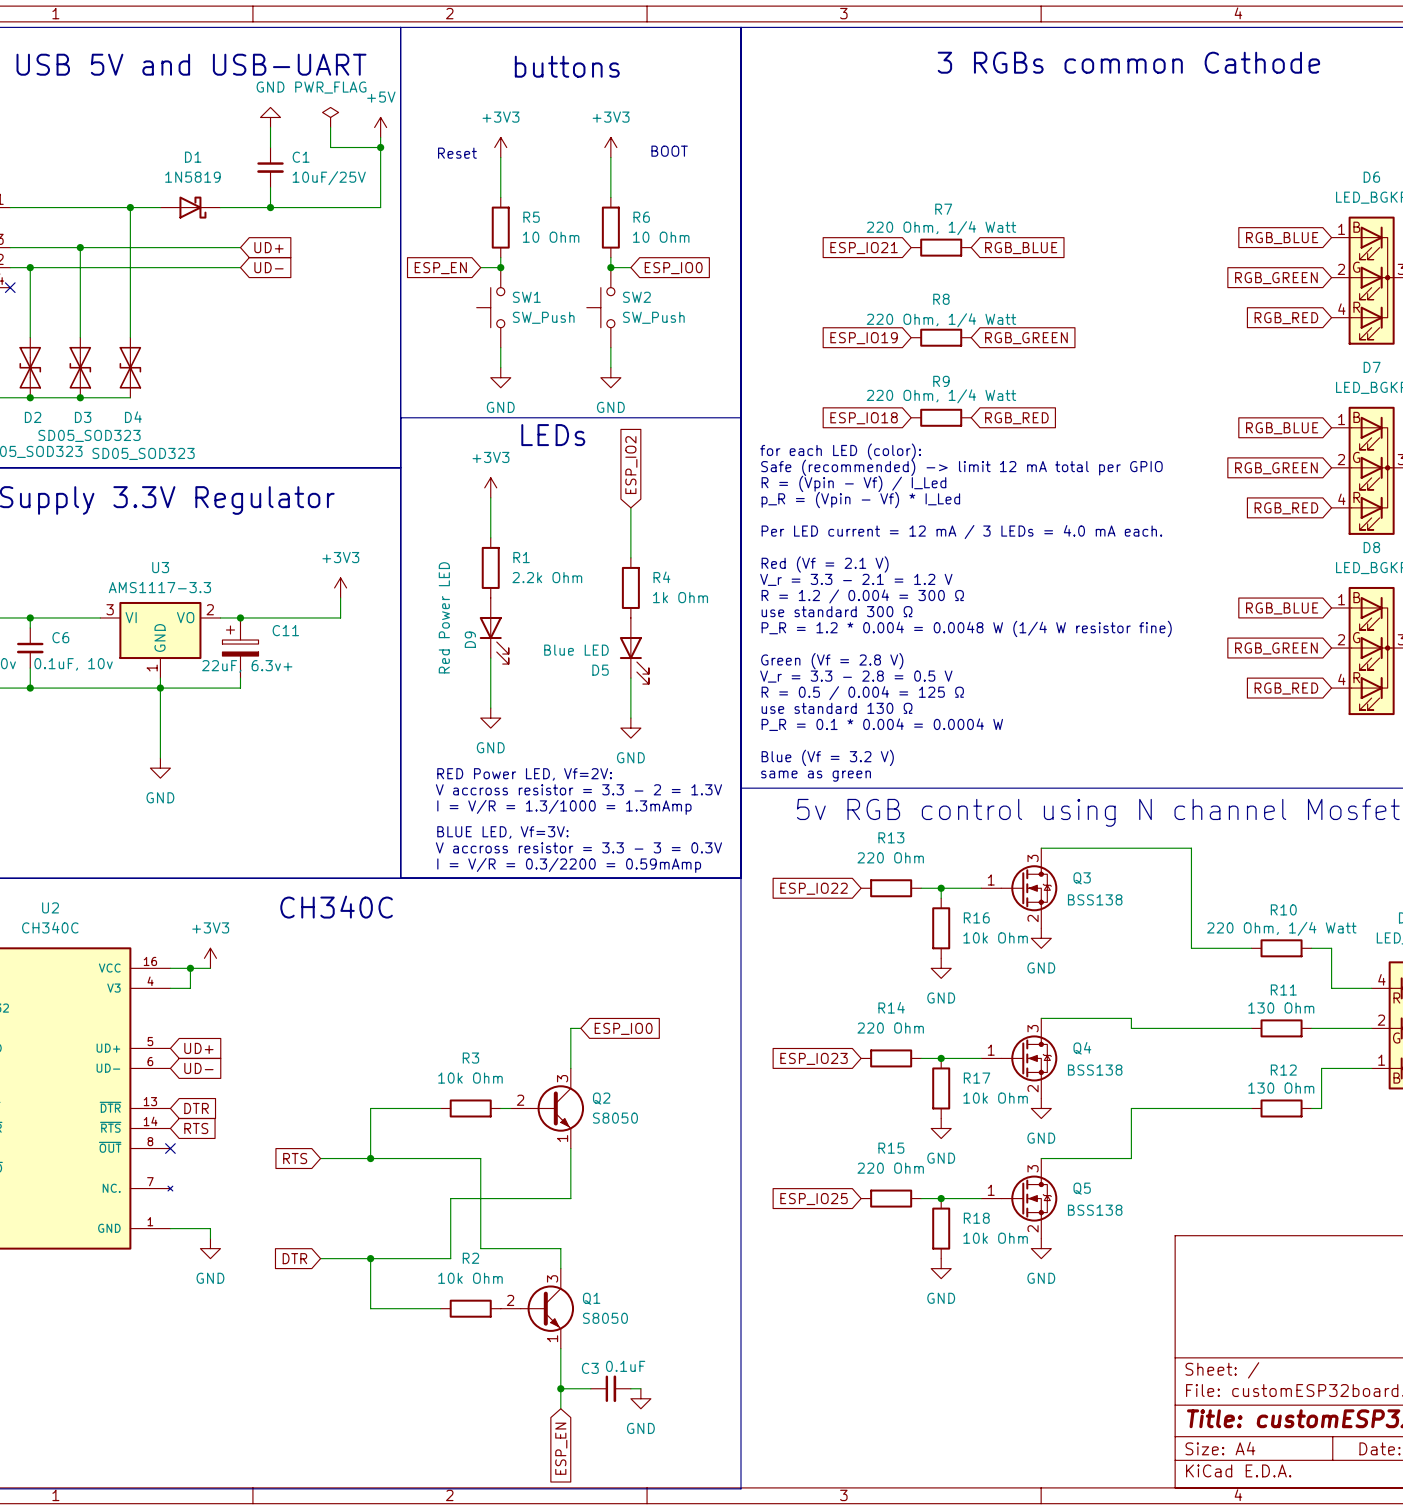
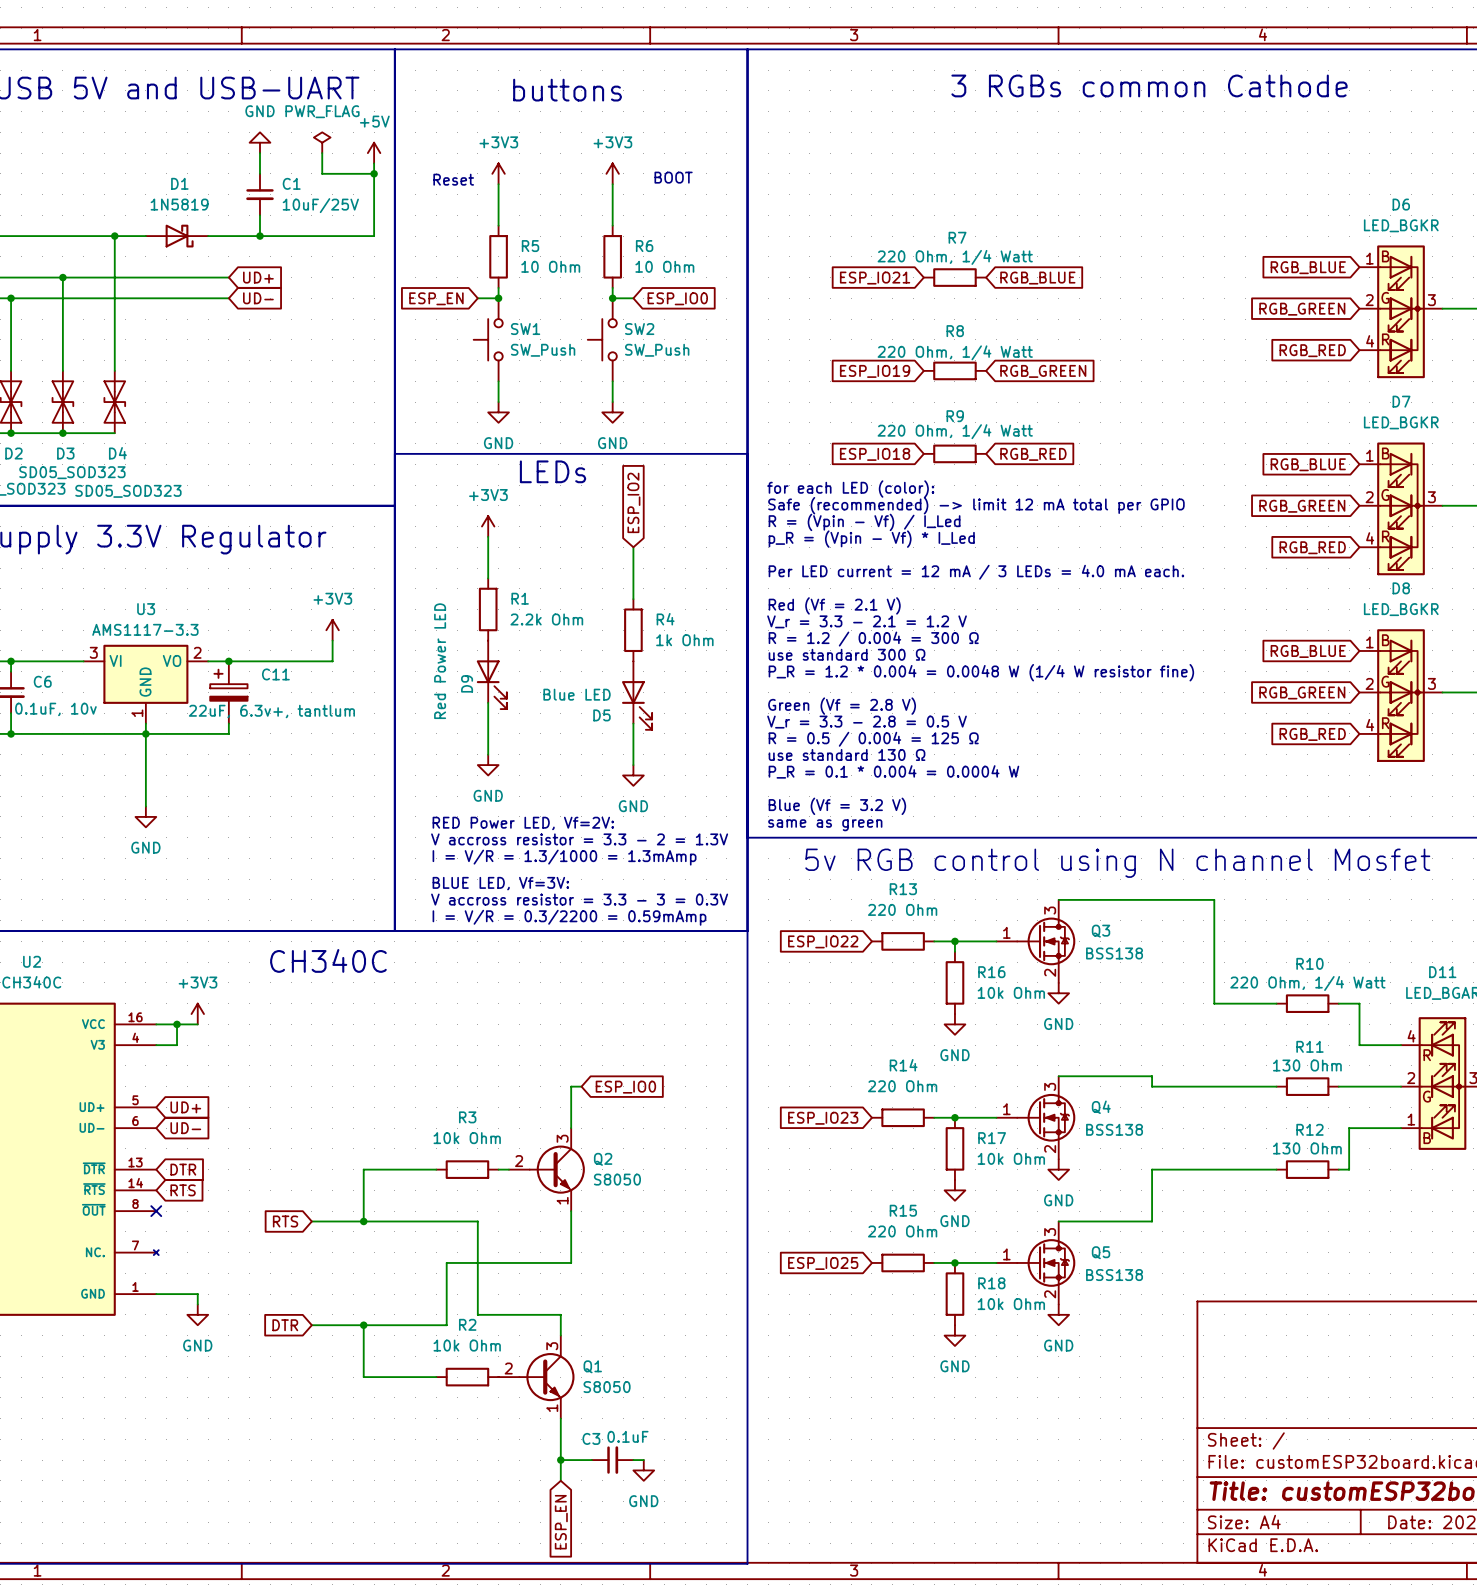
C11 value: 22uF, 6.3v+ (247, 666) -> 22uF, 6.3v+, tantlum (271, 711)

